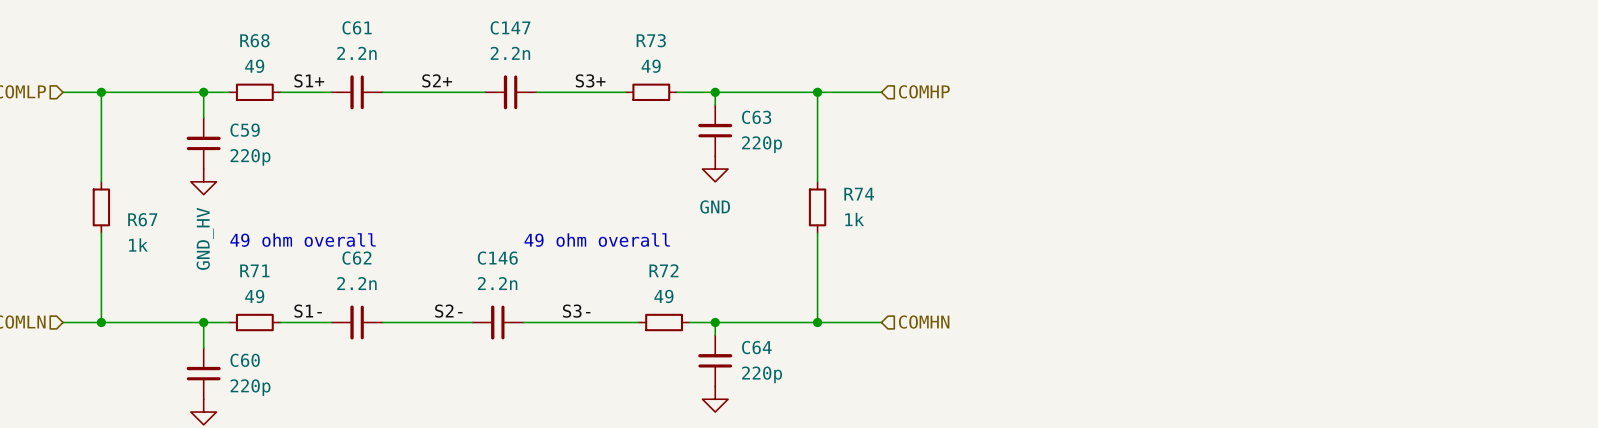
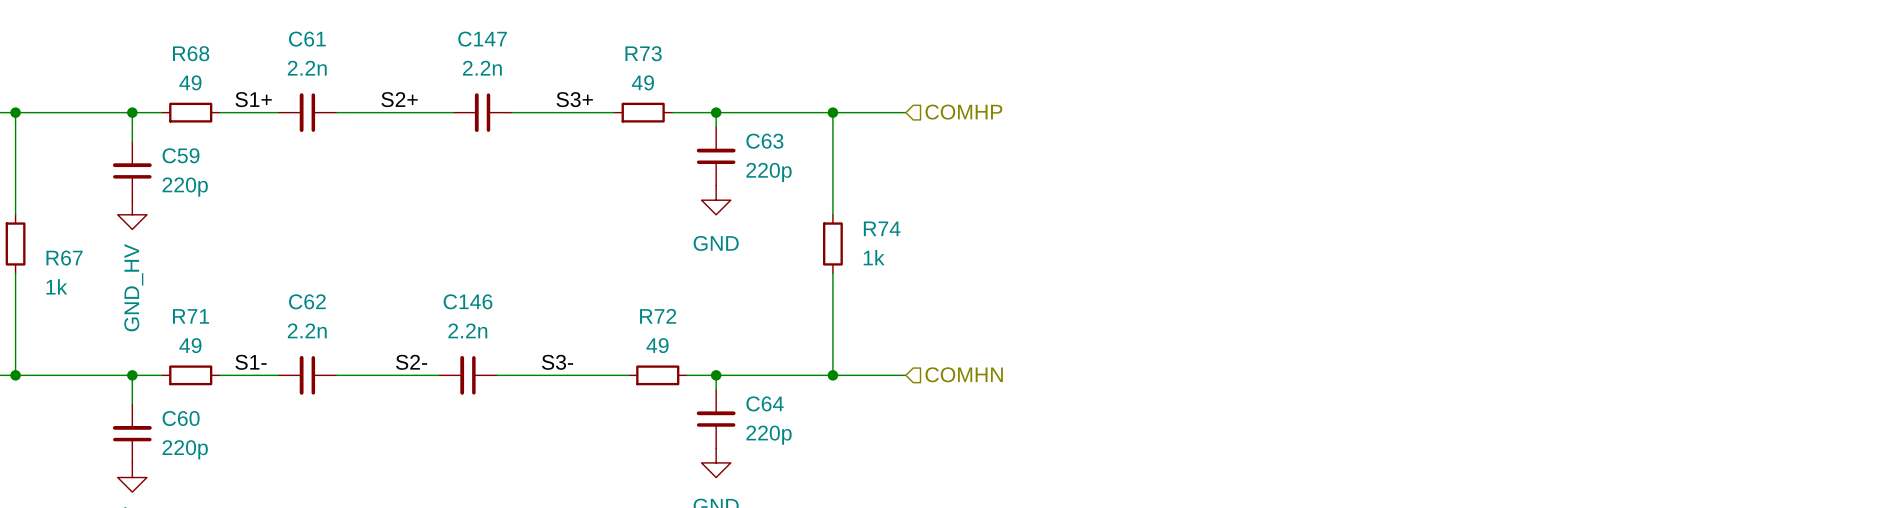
text: 49 ohm overall (303, 240) -> none
text: 49 ohm overall (597, 240) -> none

